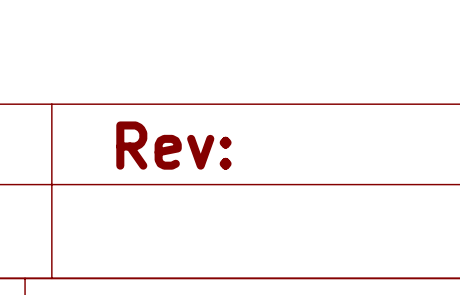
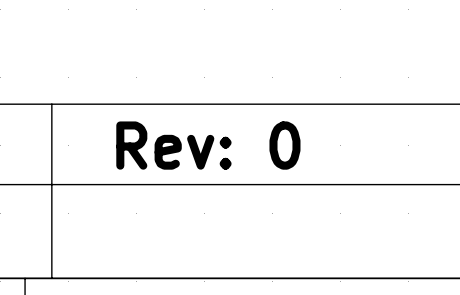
title block: Rev: (173, 145) -> Rev: 0 (208, 145)

